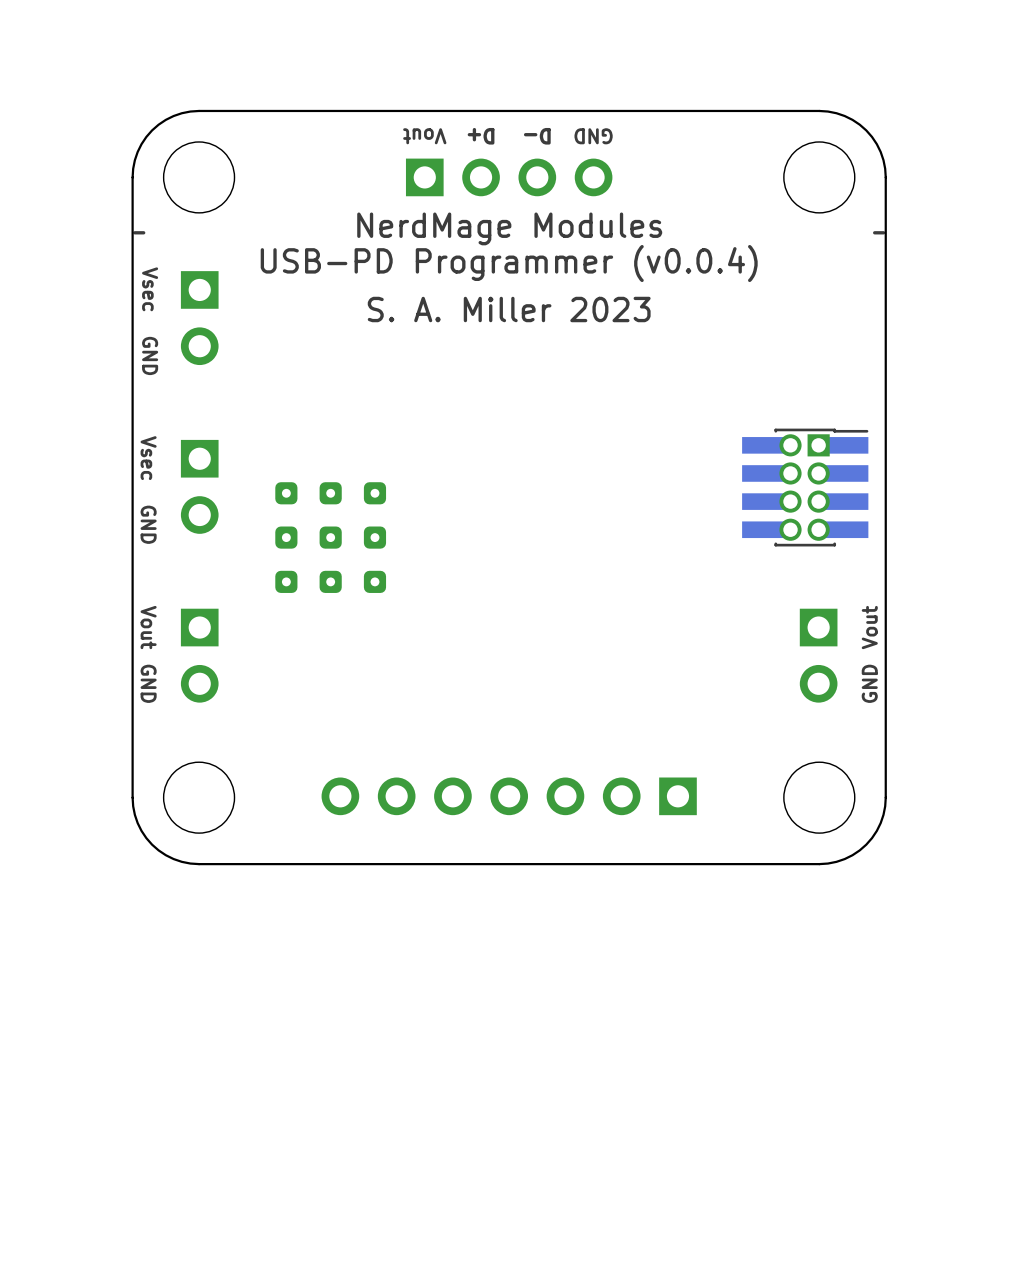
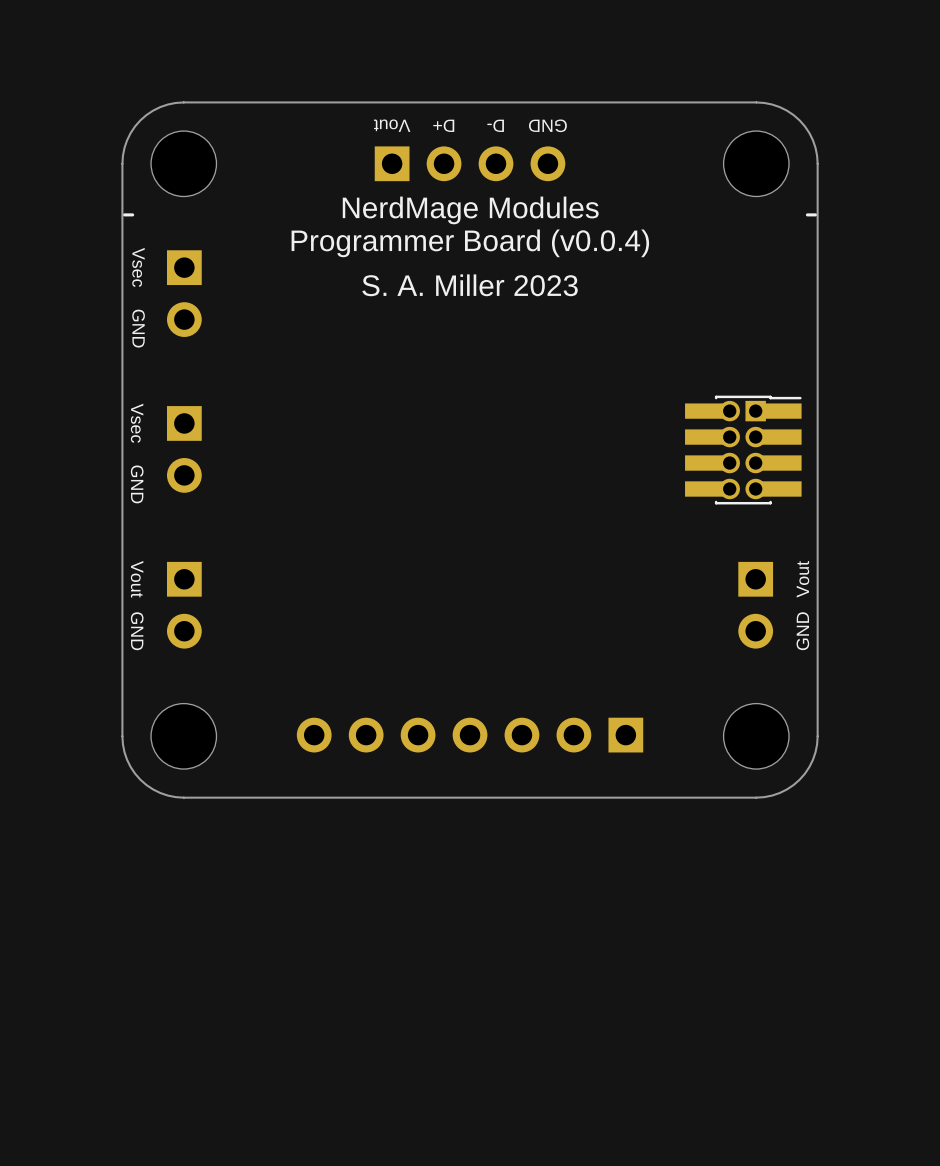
text: USB-PD Programmer (v0.0.4) (509, 263) -> Programmer Board (v0.0.4) (470, 243)
part: (330, 537) -> none

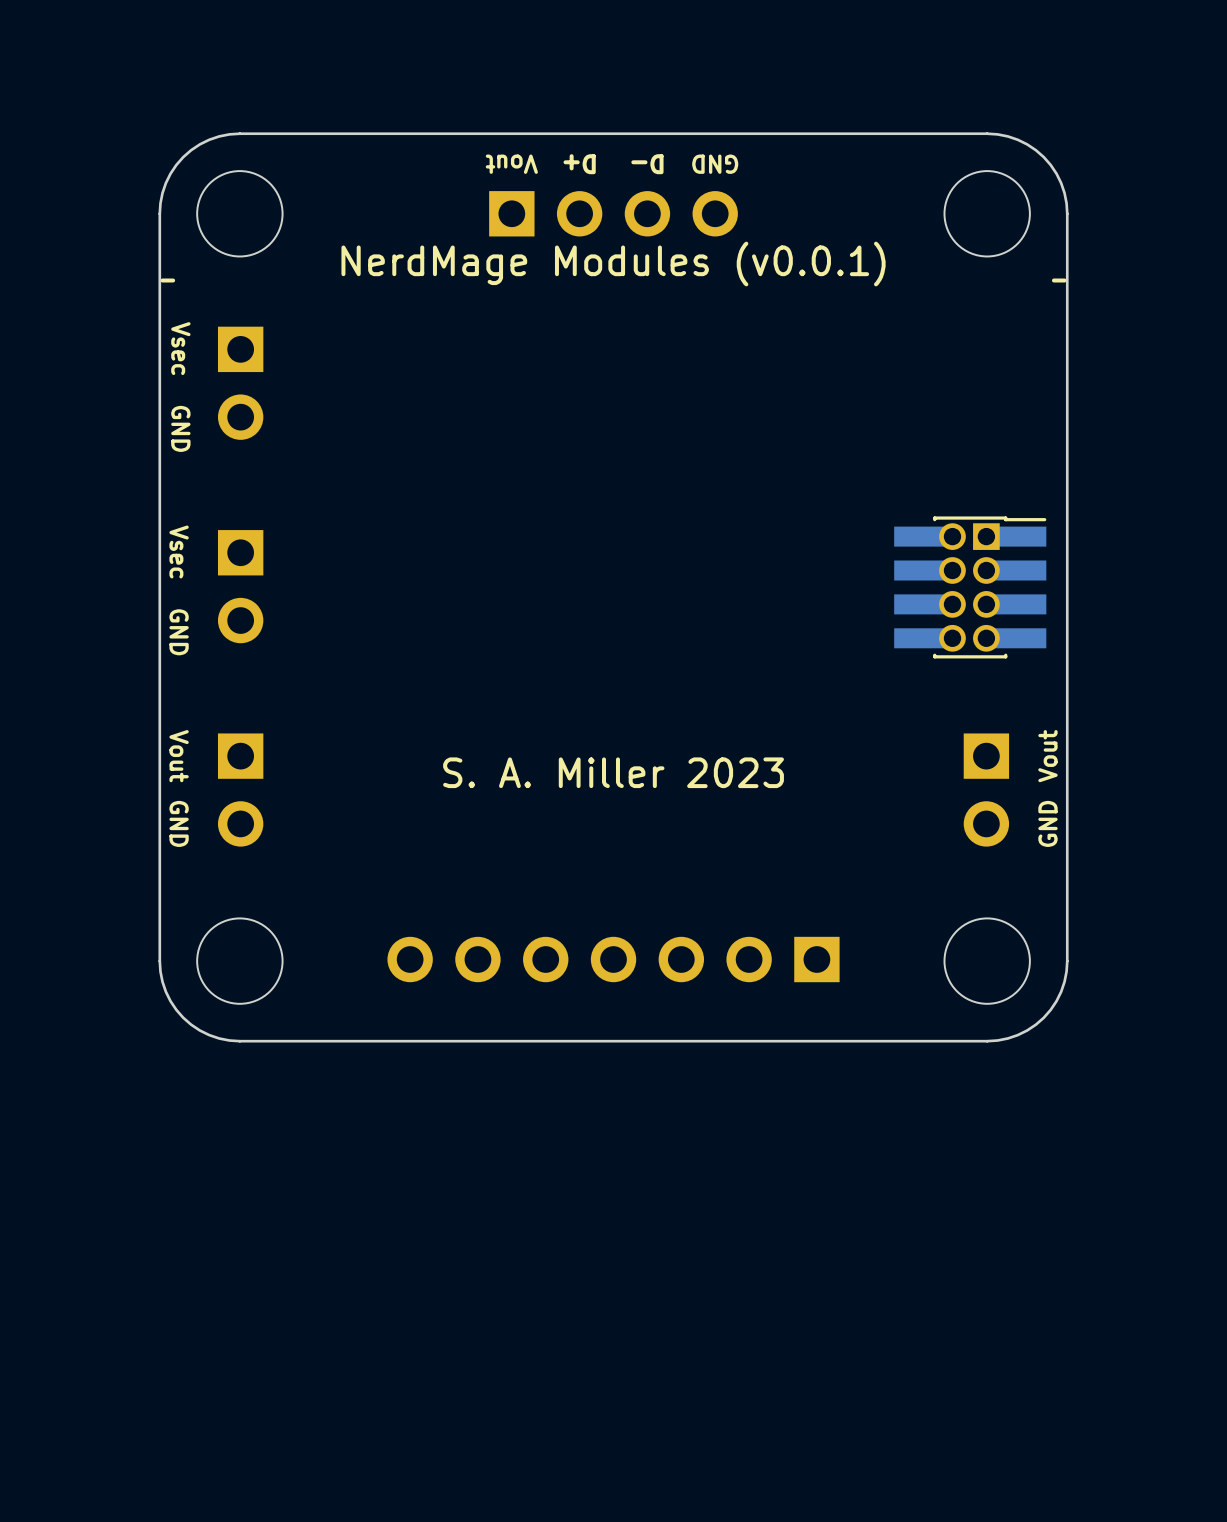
text: NerdMage Modules (470, 210) -> NerdMage Modules (v0.0.1) (613, 264)
text: Programmer Board (v0.0.4) (470, 243) -> none
text position: S. A. Miller 2023 (470, 285) -> S. A. Miller 2023 (613, 772)

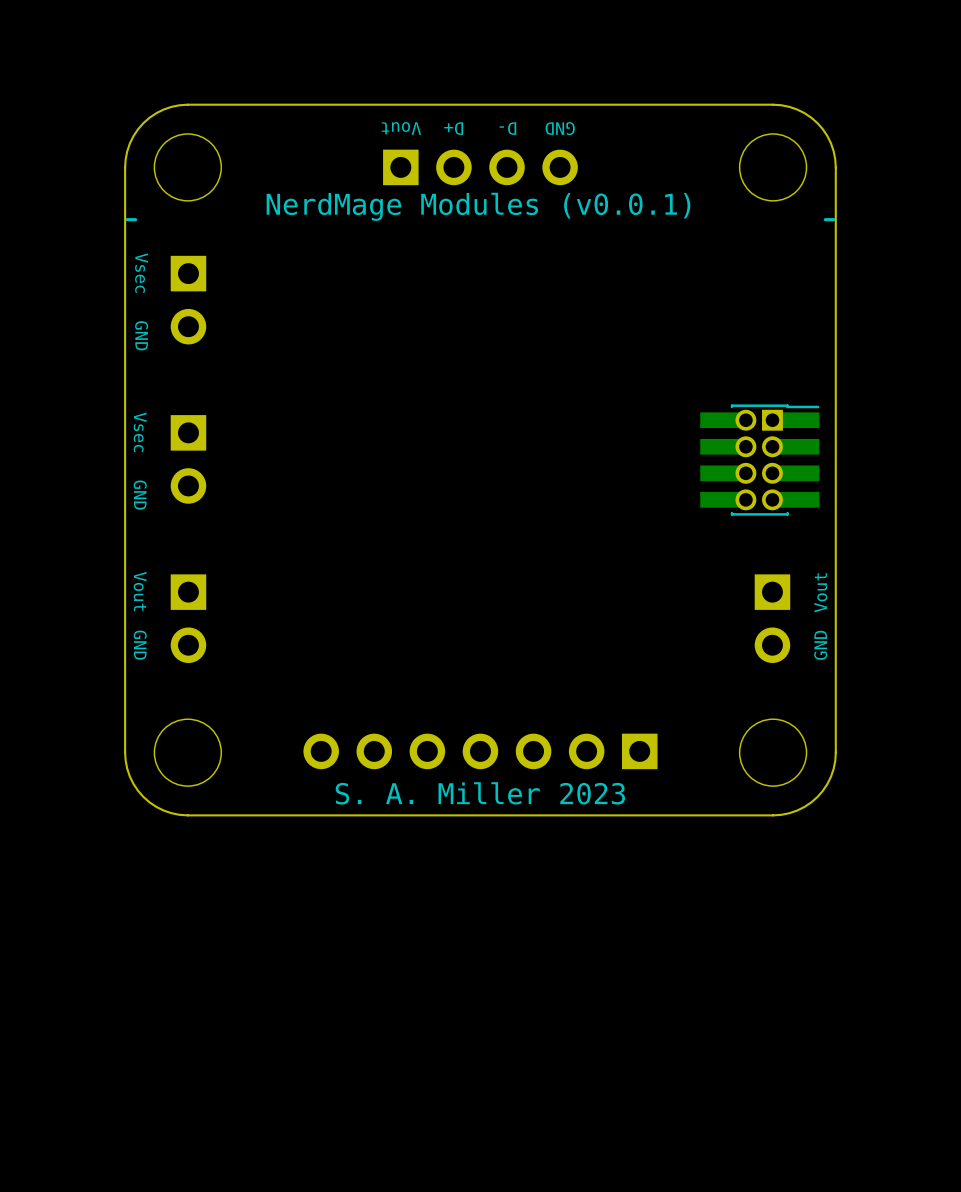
text position: S. A. Miller 2023 (613, 772) -> S. A. Miller 2023 (480, 793)

